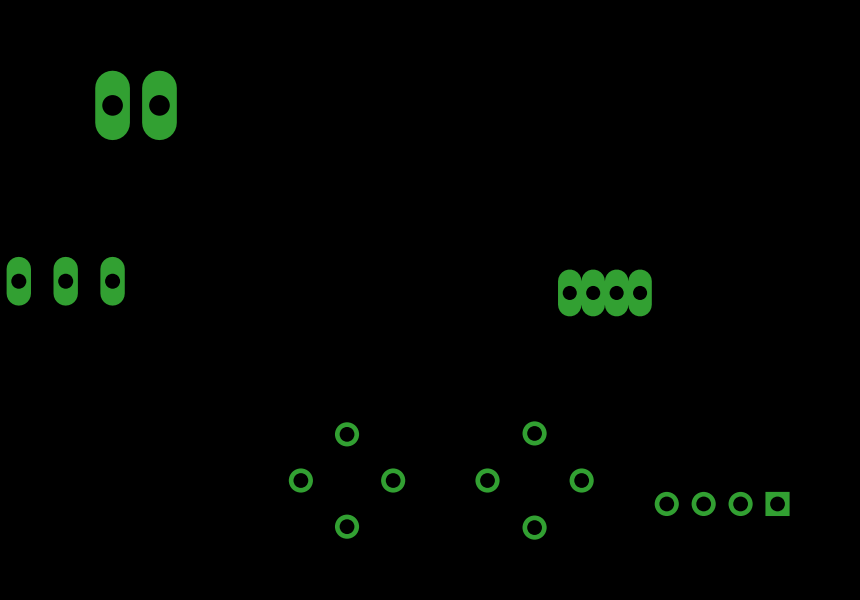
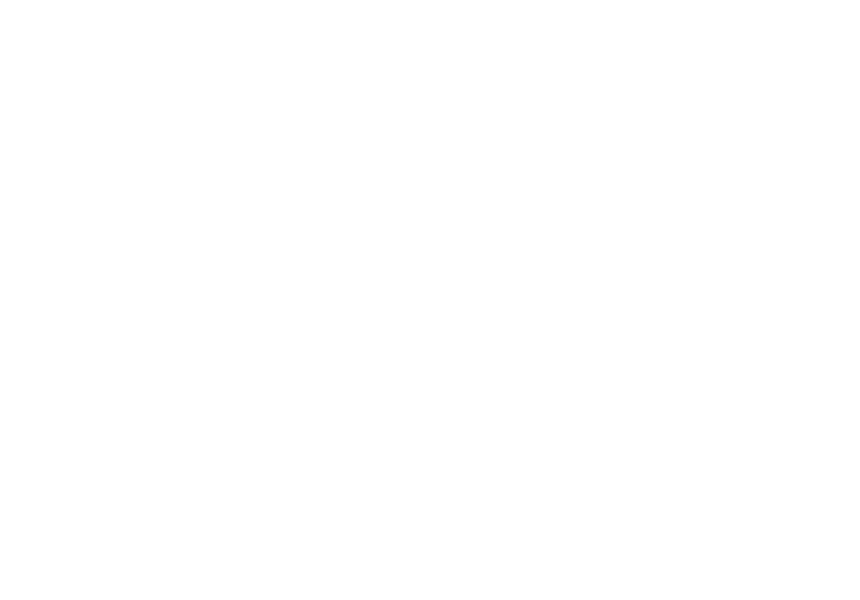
part: (136, 105) -> none
part: (65, 281) -> none
part: (604, 292) -> none
part: (347, 480) -> none
part: (534, 480) -> none
part: (722, 503) -> none

